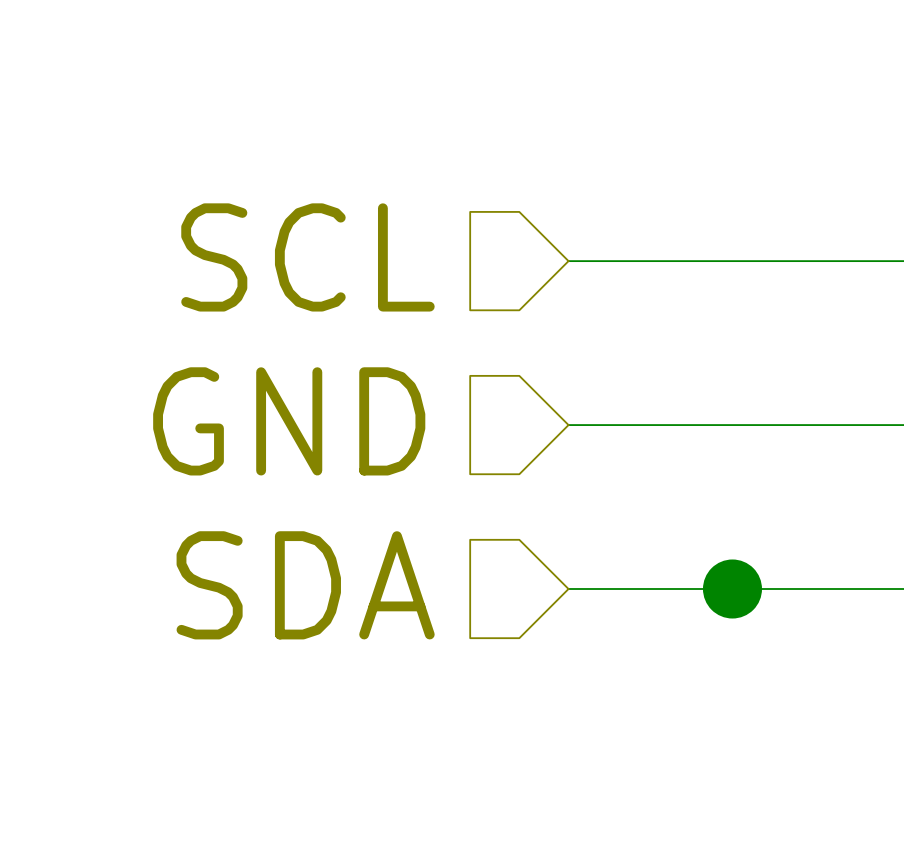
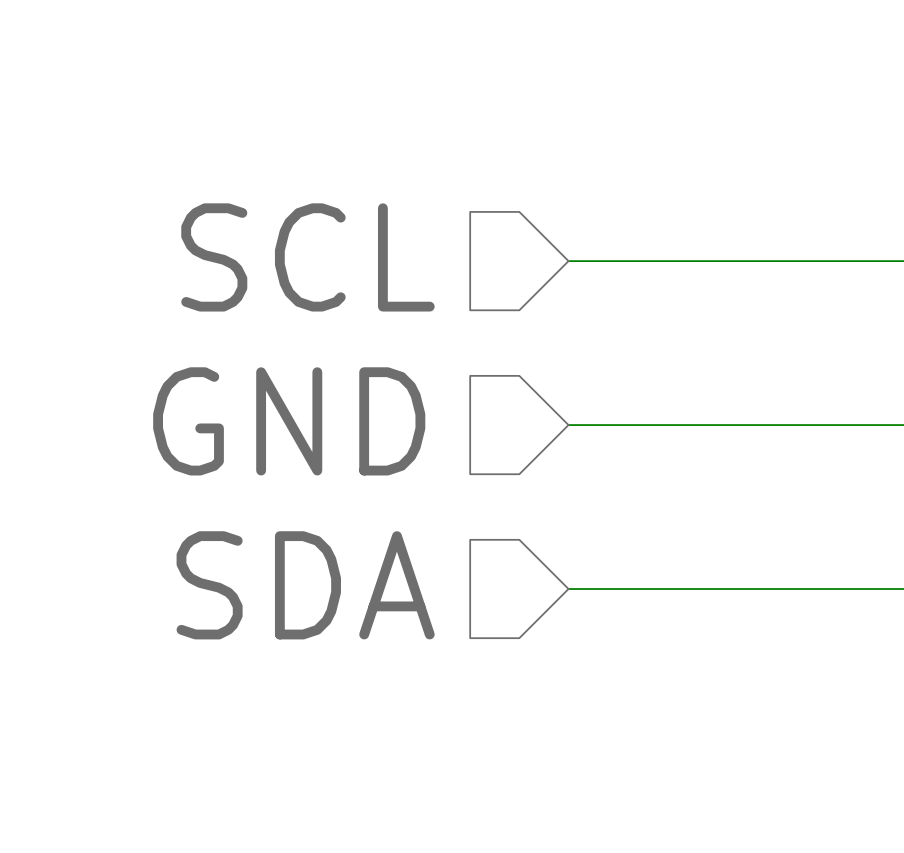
junction: (732, 589) -> none

